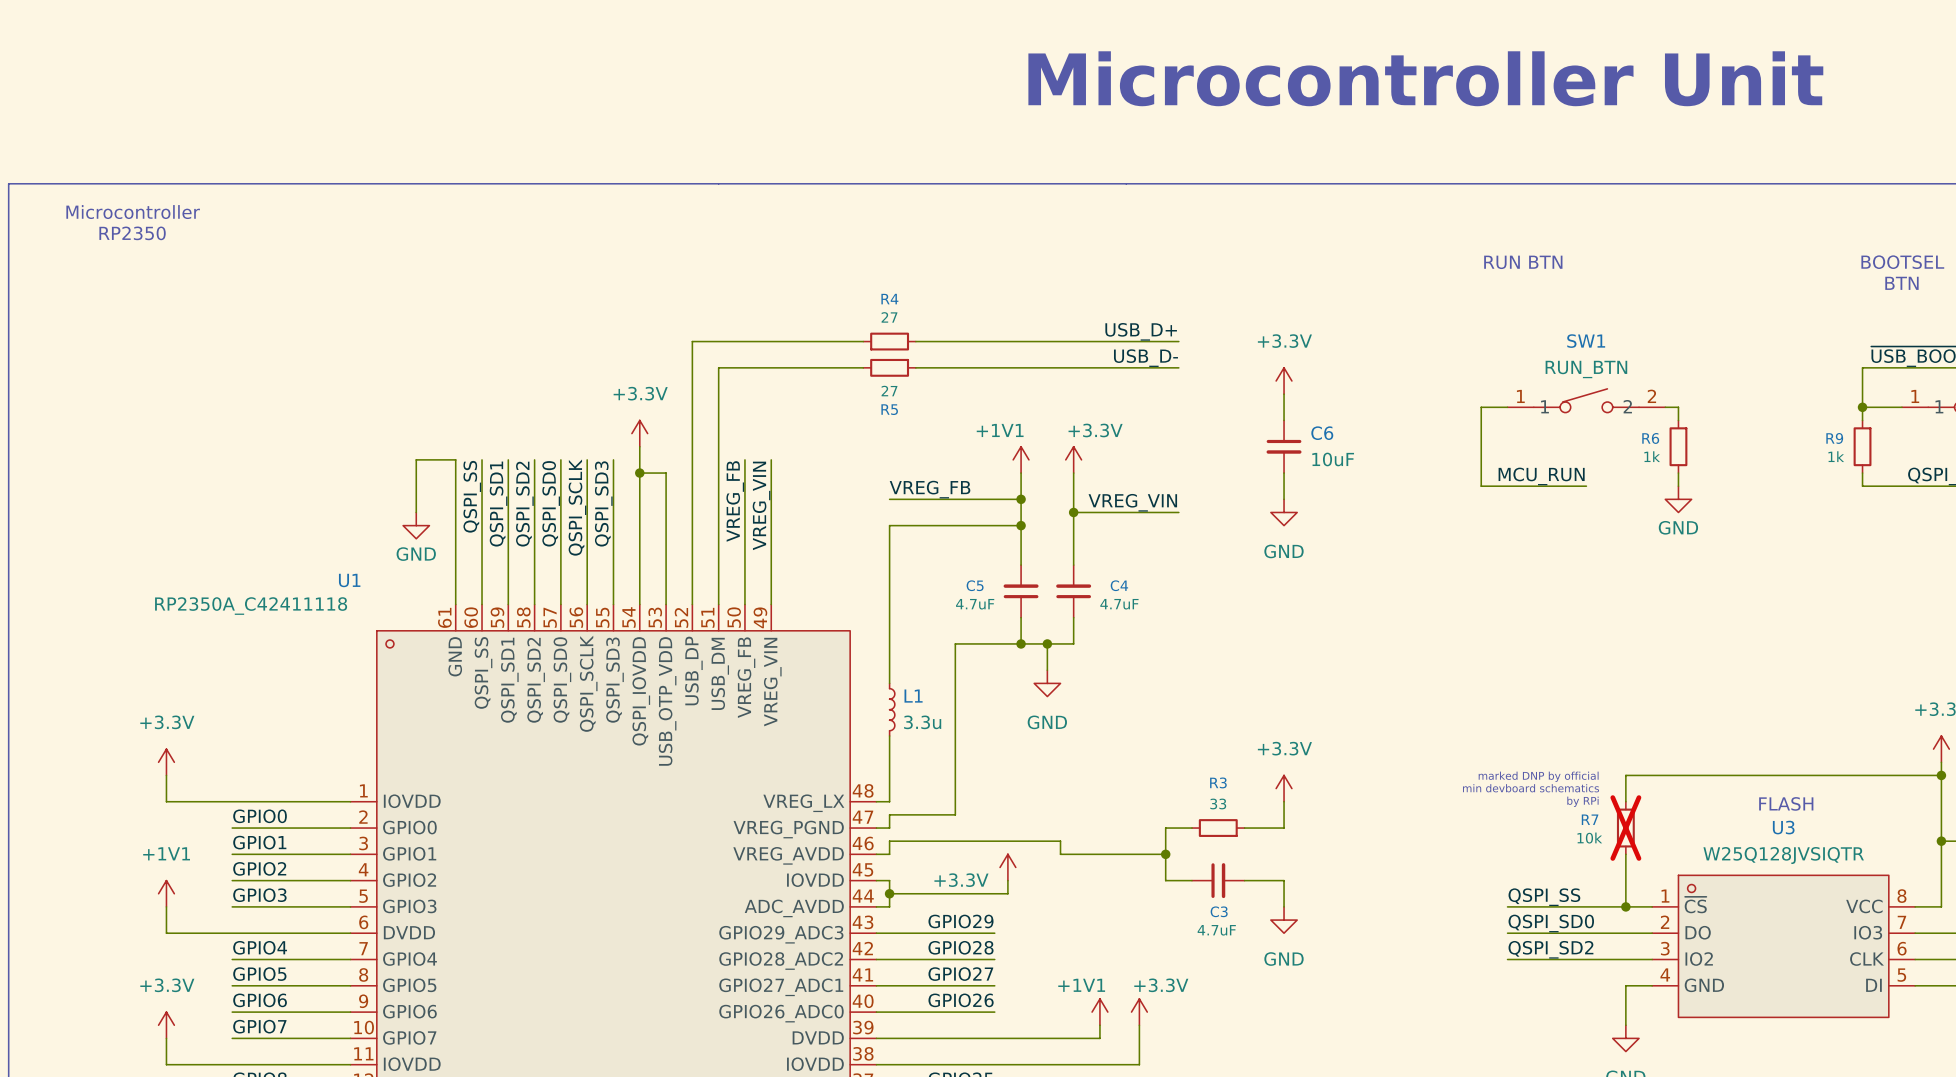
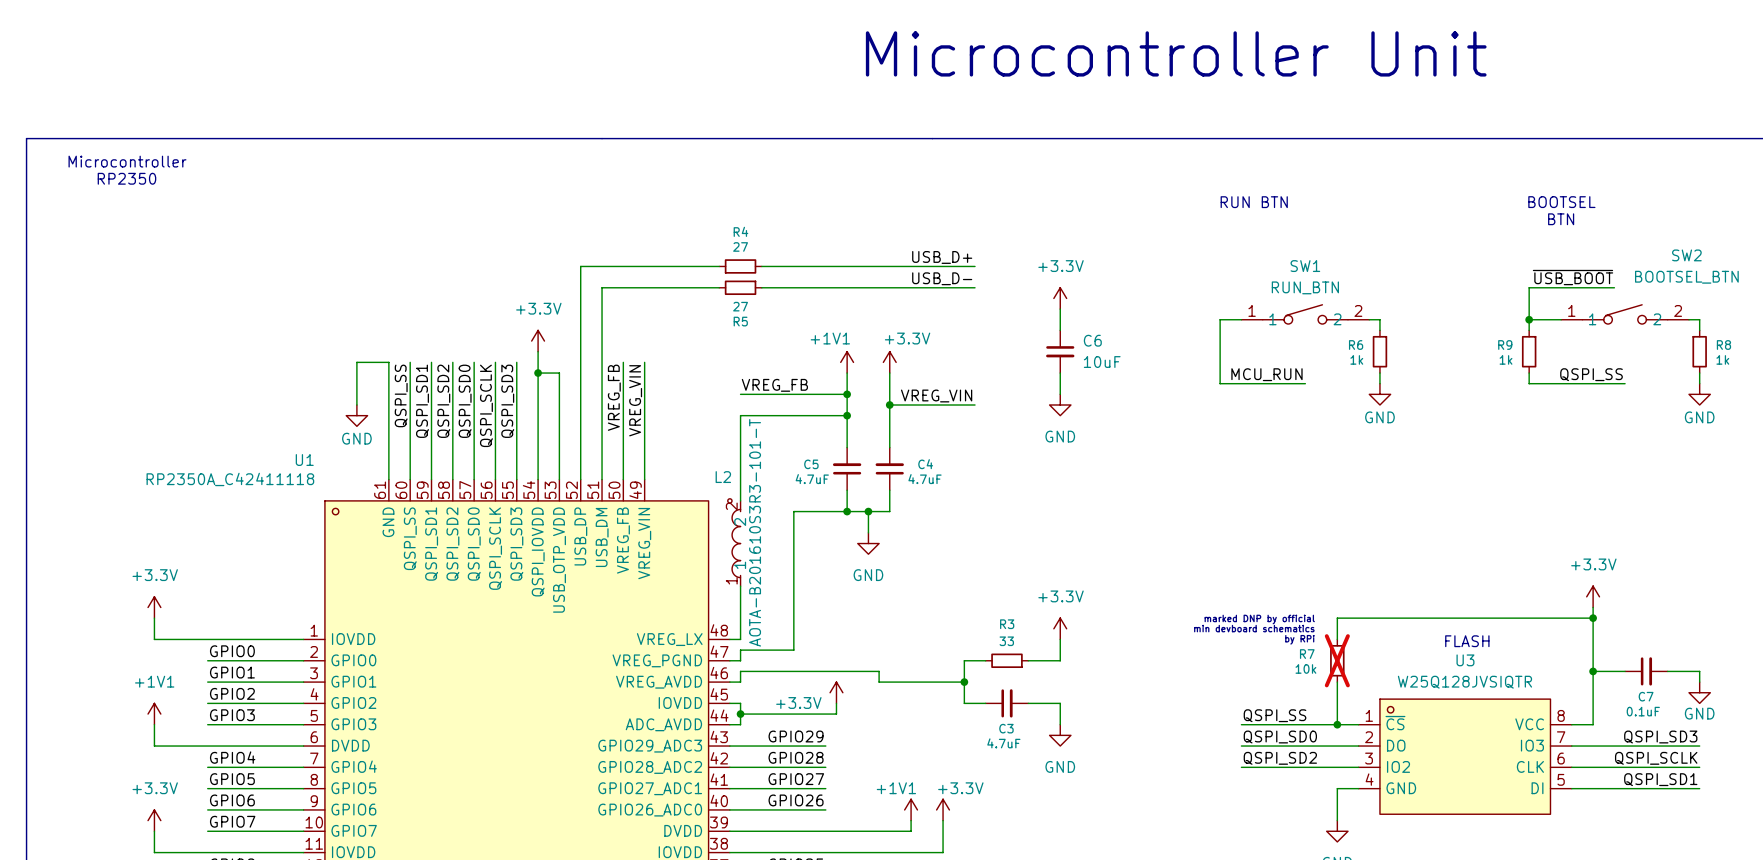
wire: (889, 630) (889, 683) -> none
L2: none -> AOTA-B201610S3R3-101-T (734, 542)
L1: 3.3u (892, 709) -> none

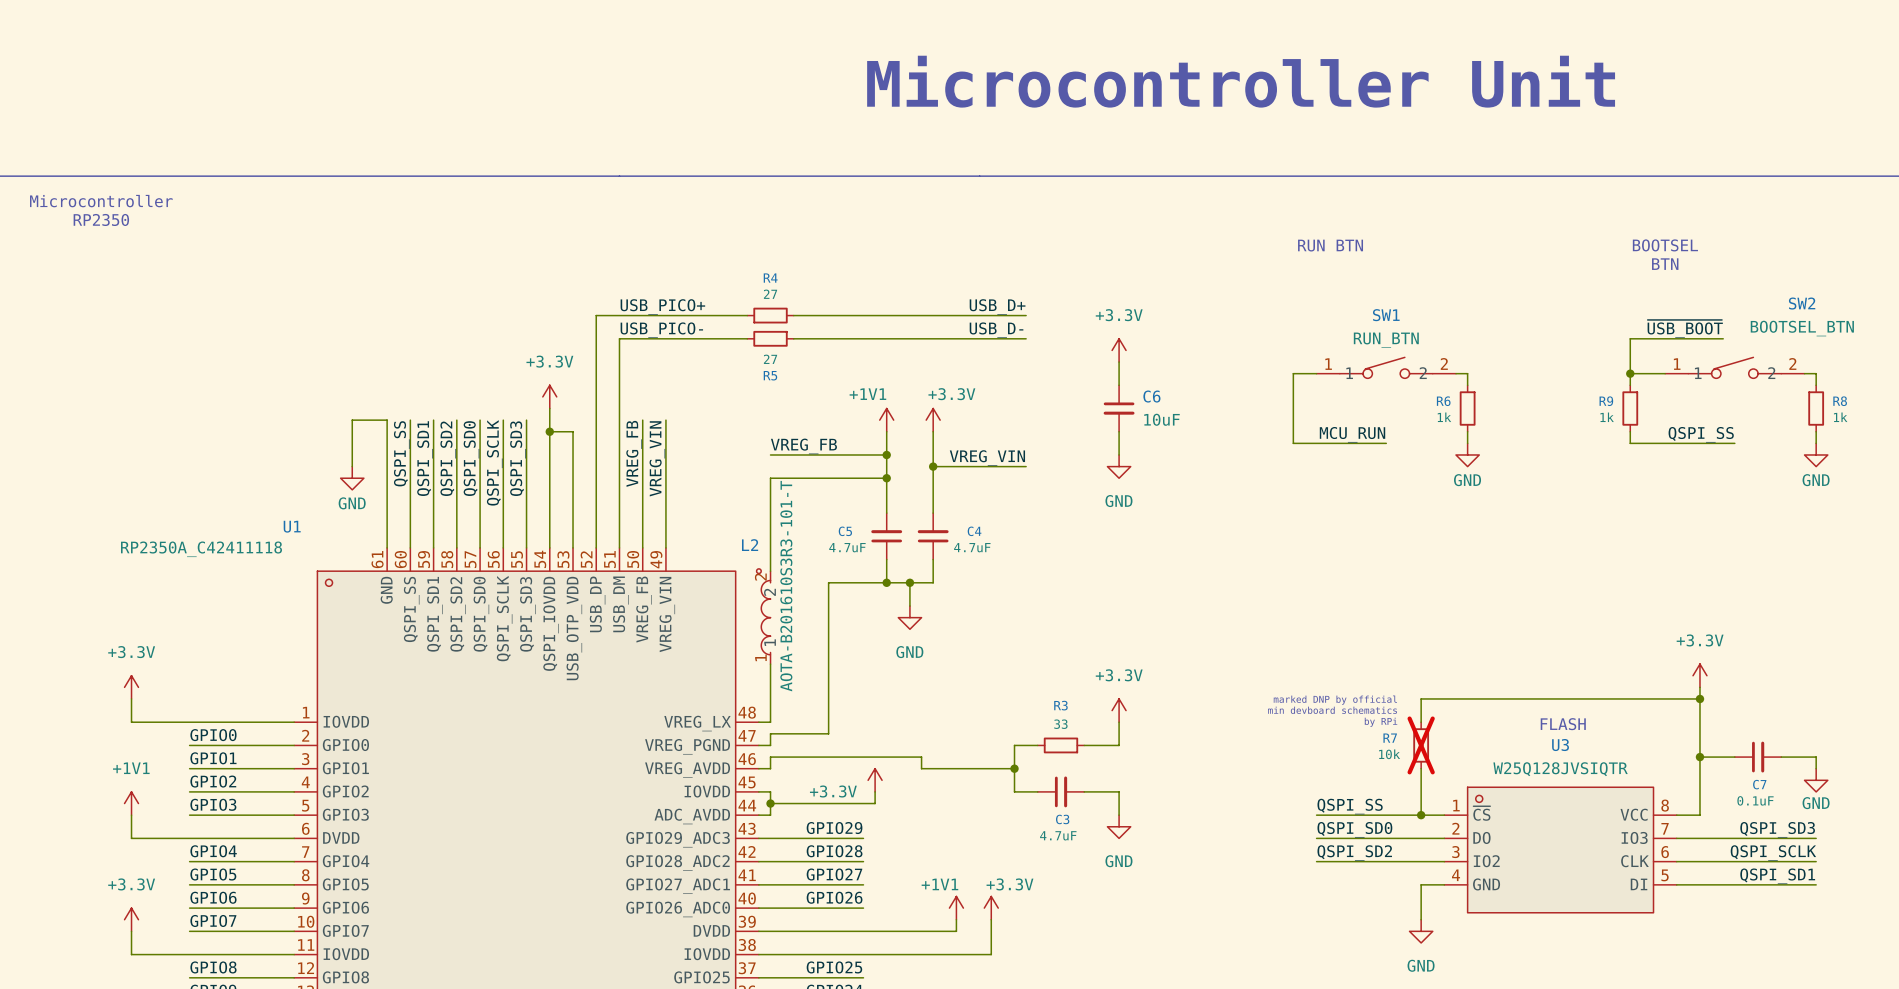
label: none -> USB_PICO+ (662, 306)
label: none -> USB_PICO- (661, 330)

